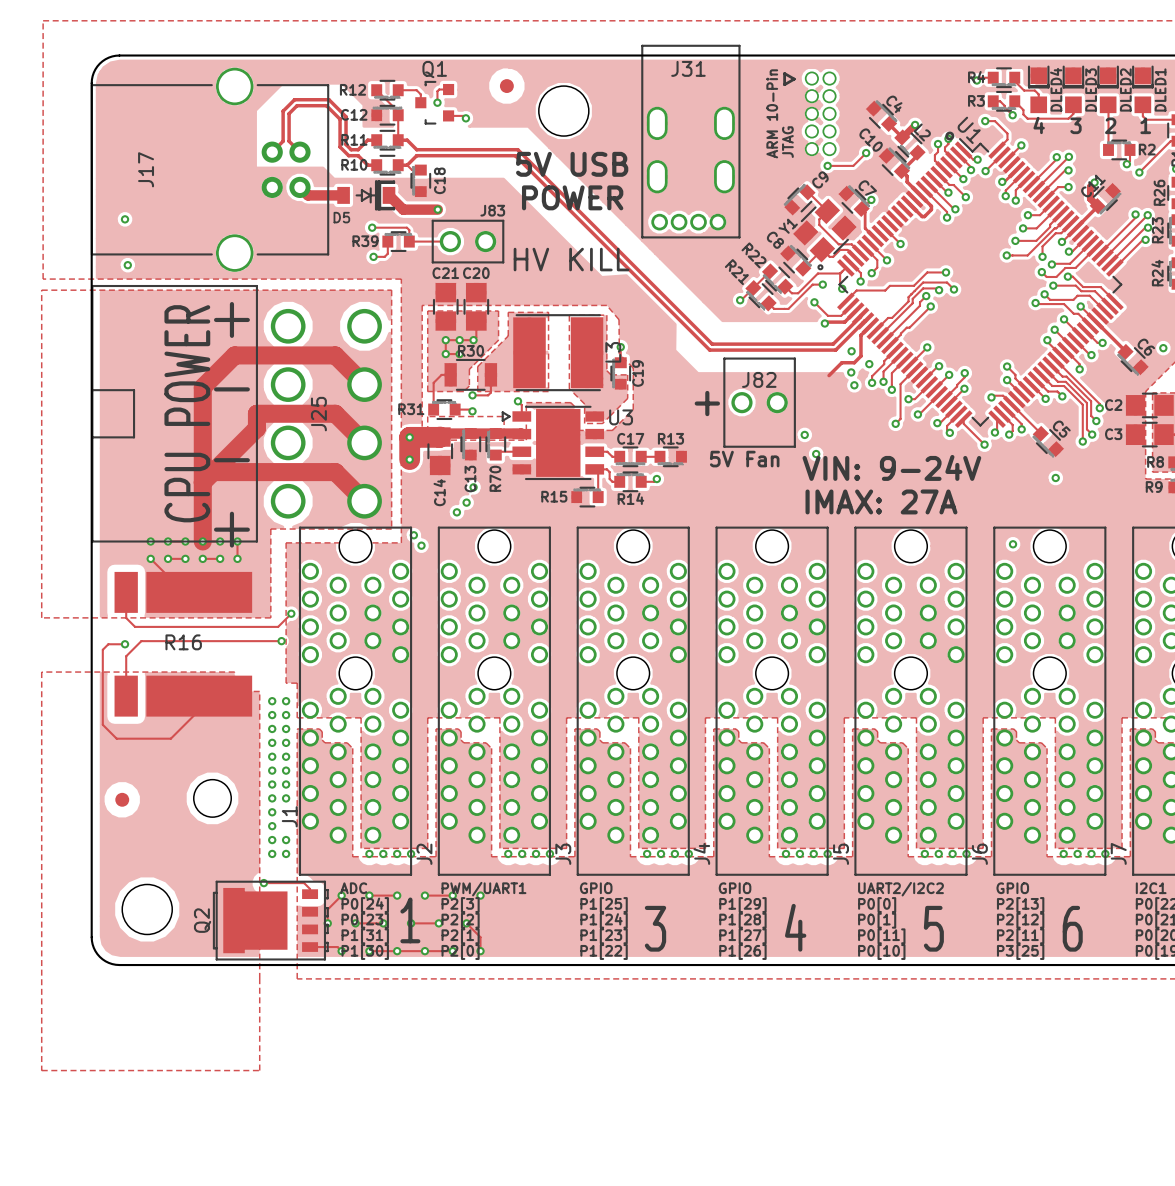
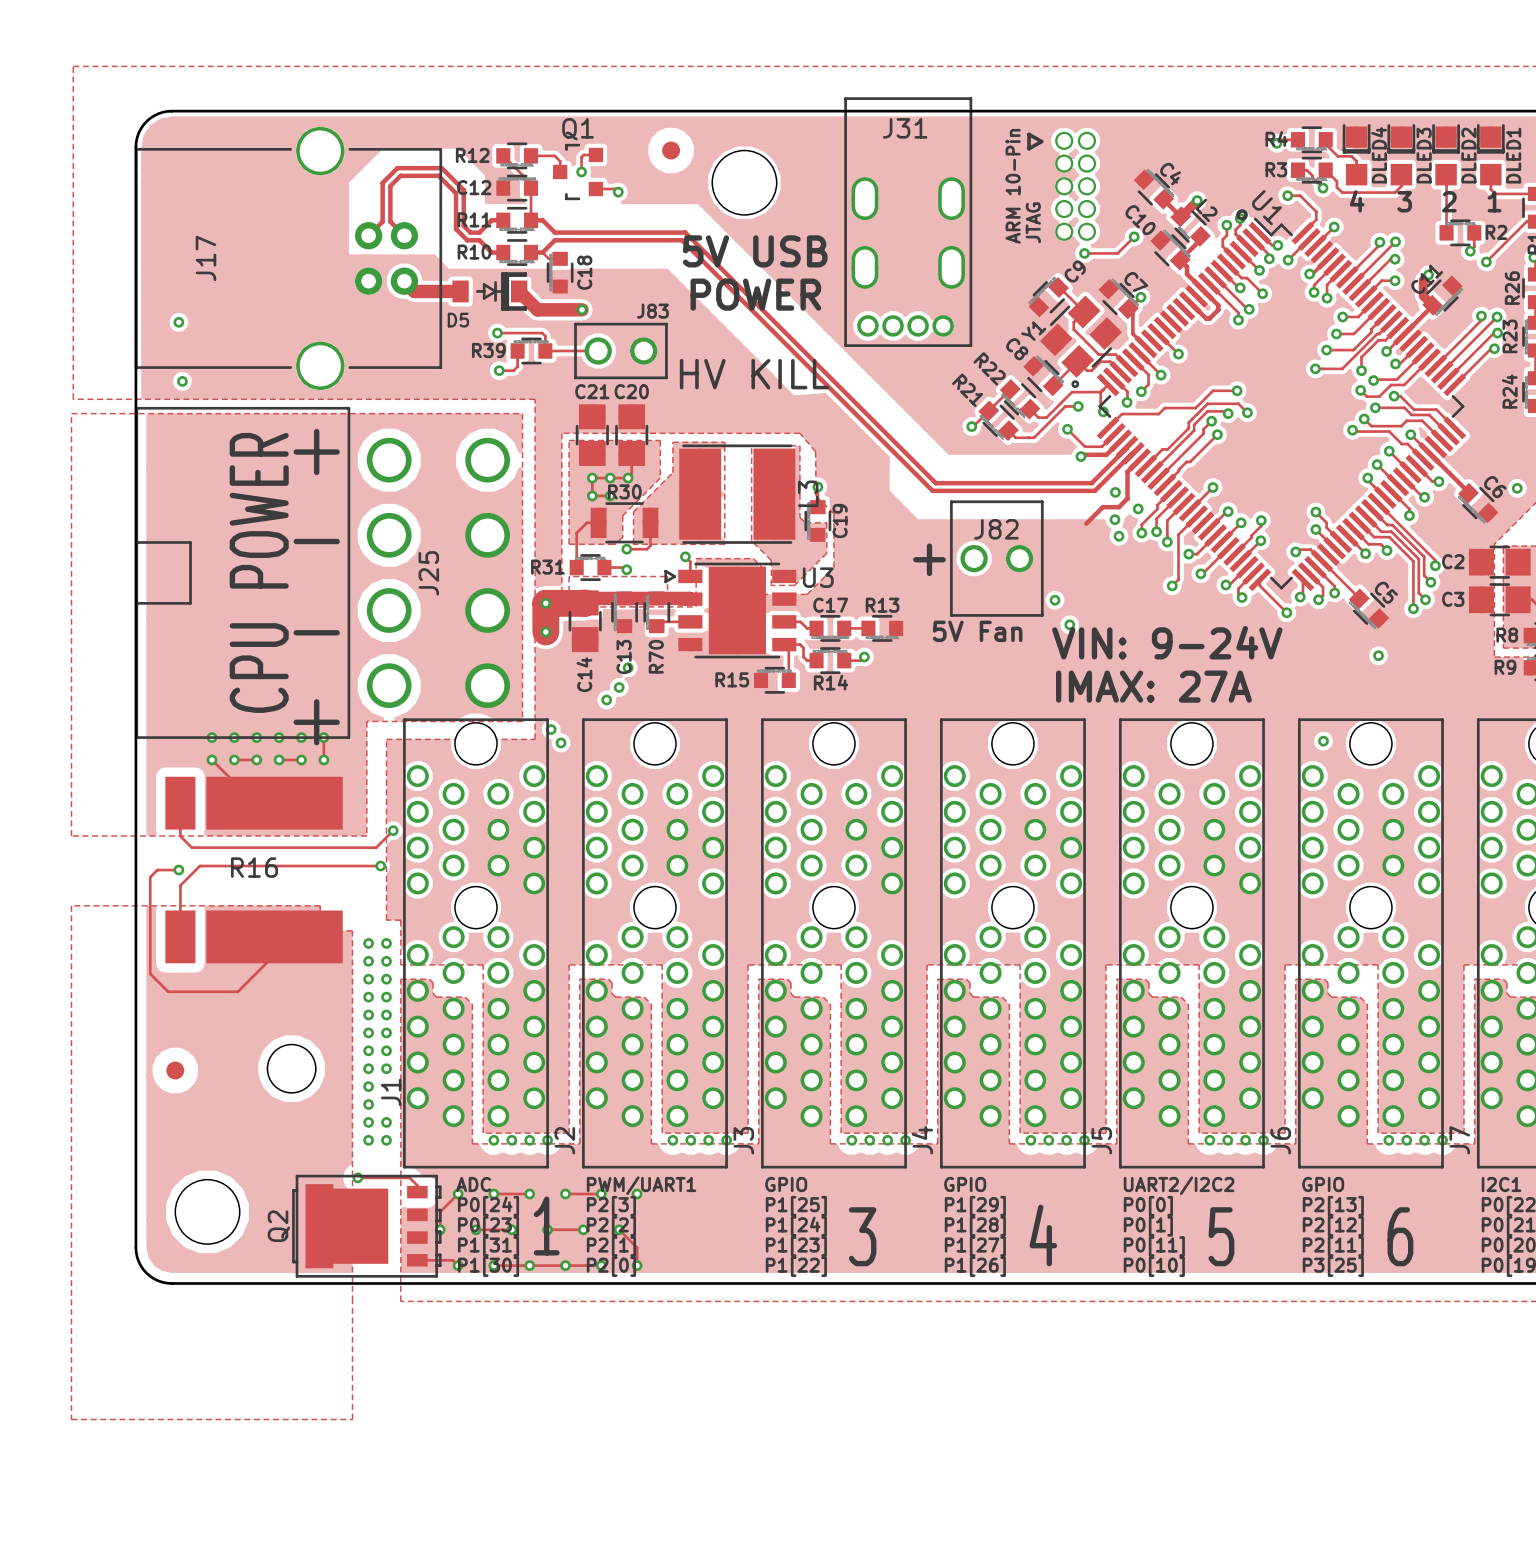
track: (364, 384) (335, 355) (234, 355) (202, 387) (202, 541) -> none
track: (364, 442) (335, 413) (256, 413) (256, 428) (202, 482) -> none
track: (213, 472) (335, 472) (364, 501) -> none

